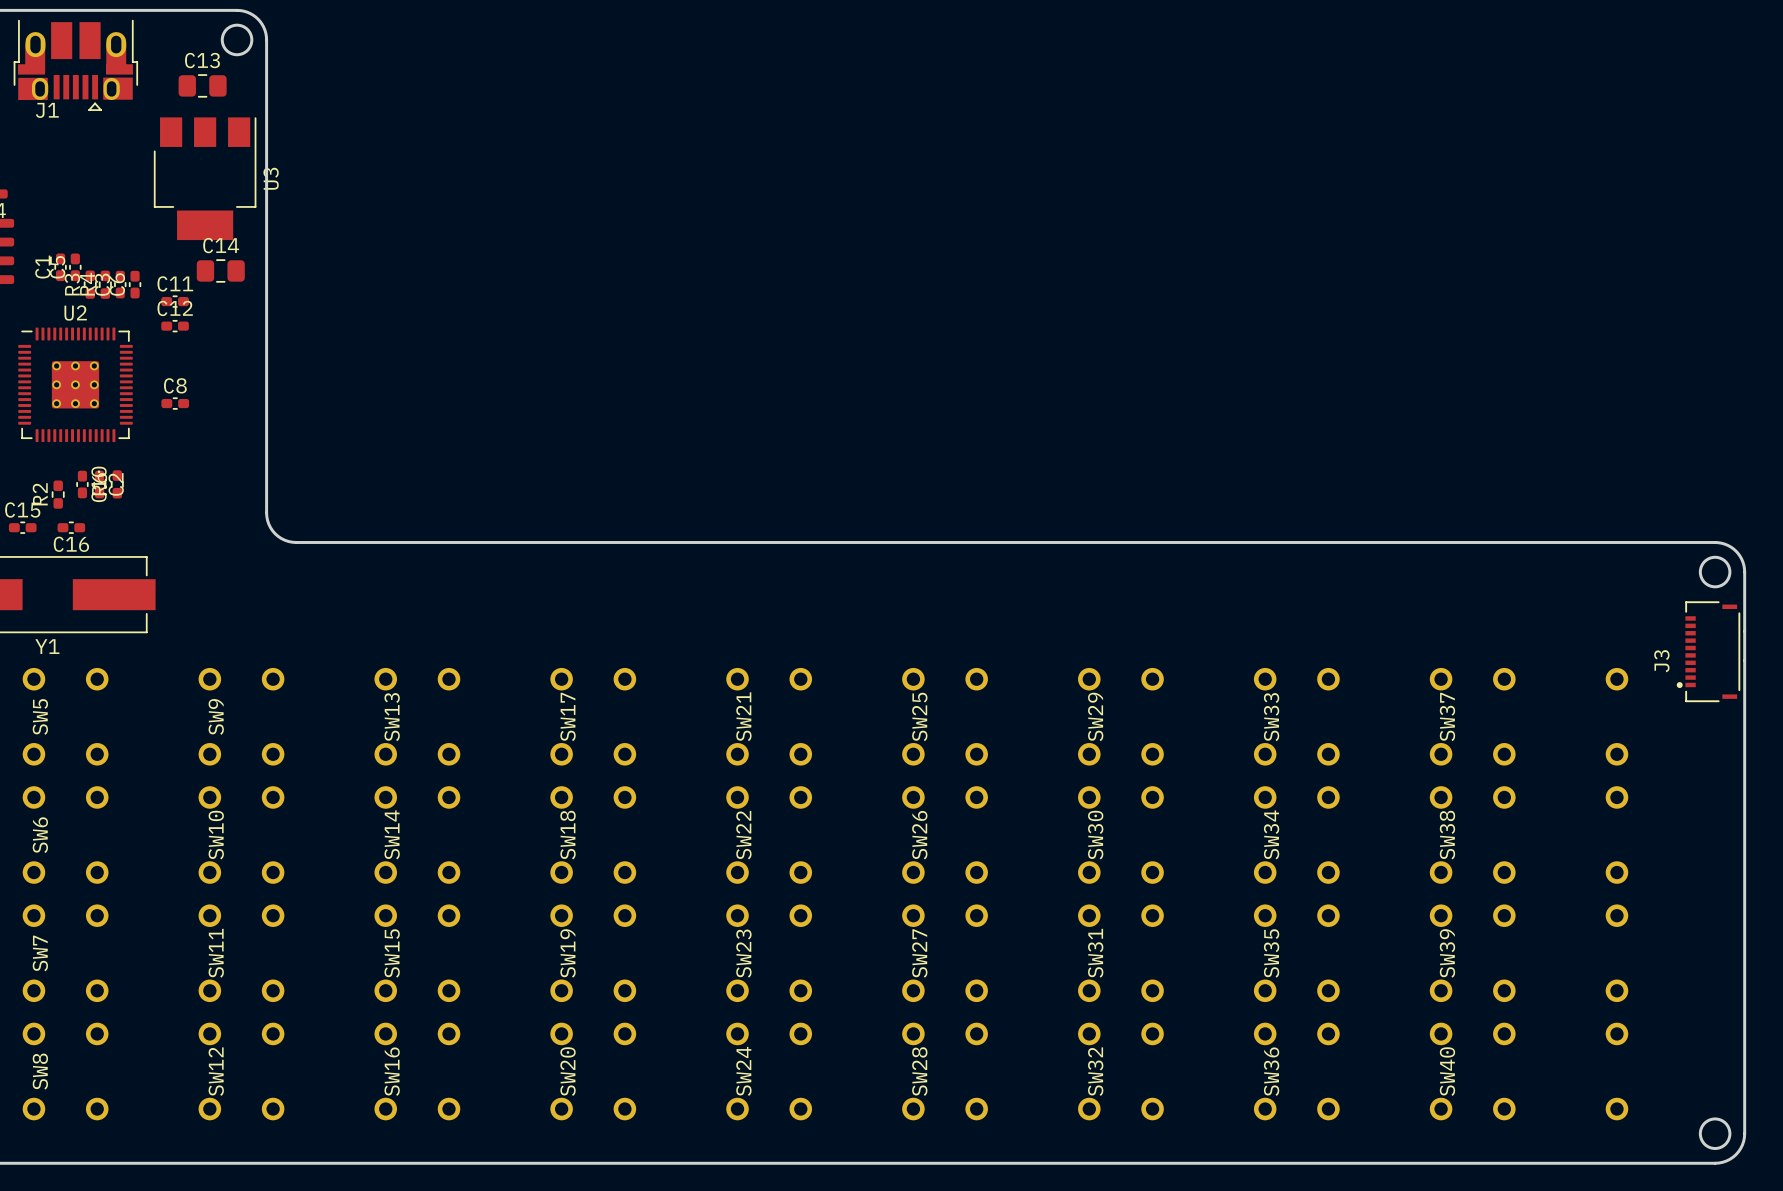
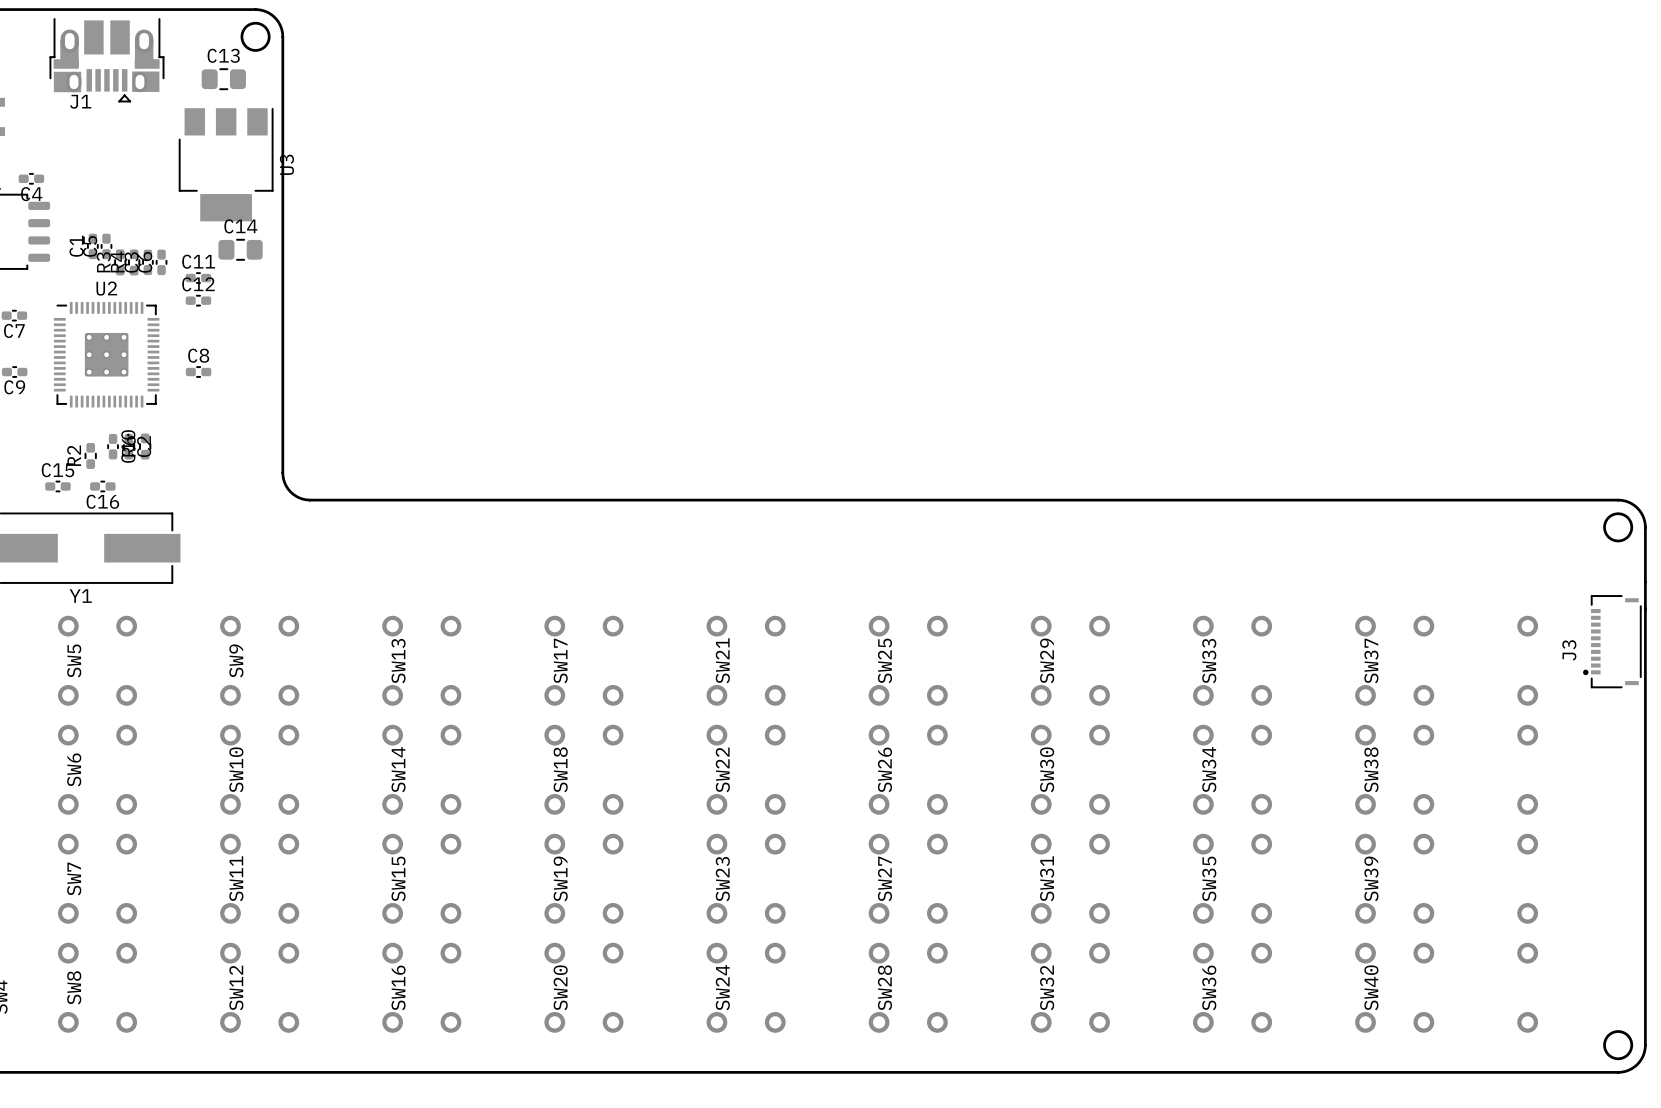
J3 position: (1708, 651) -> (1612, 641)

